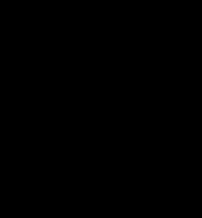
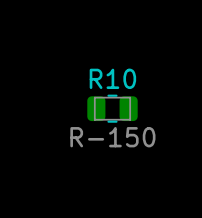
R10: none -> R-150 (112, 108)

